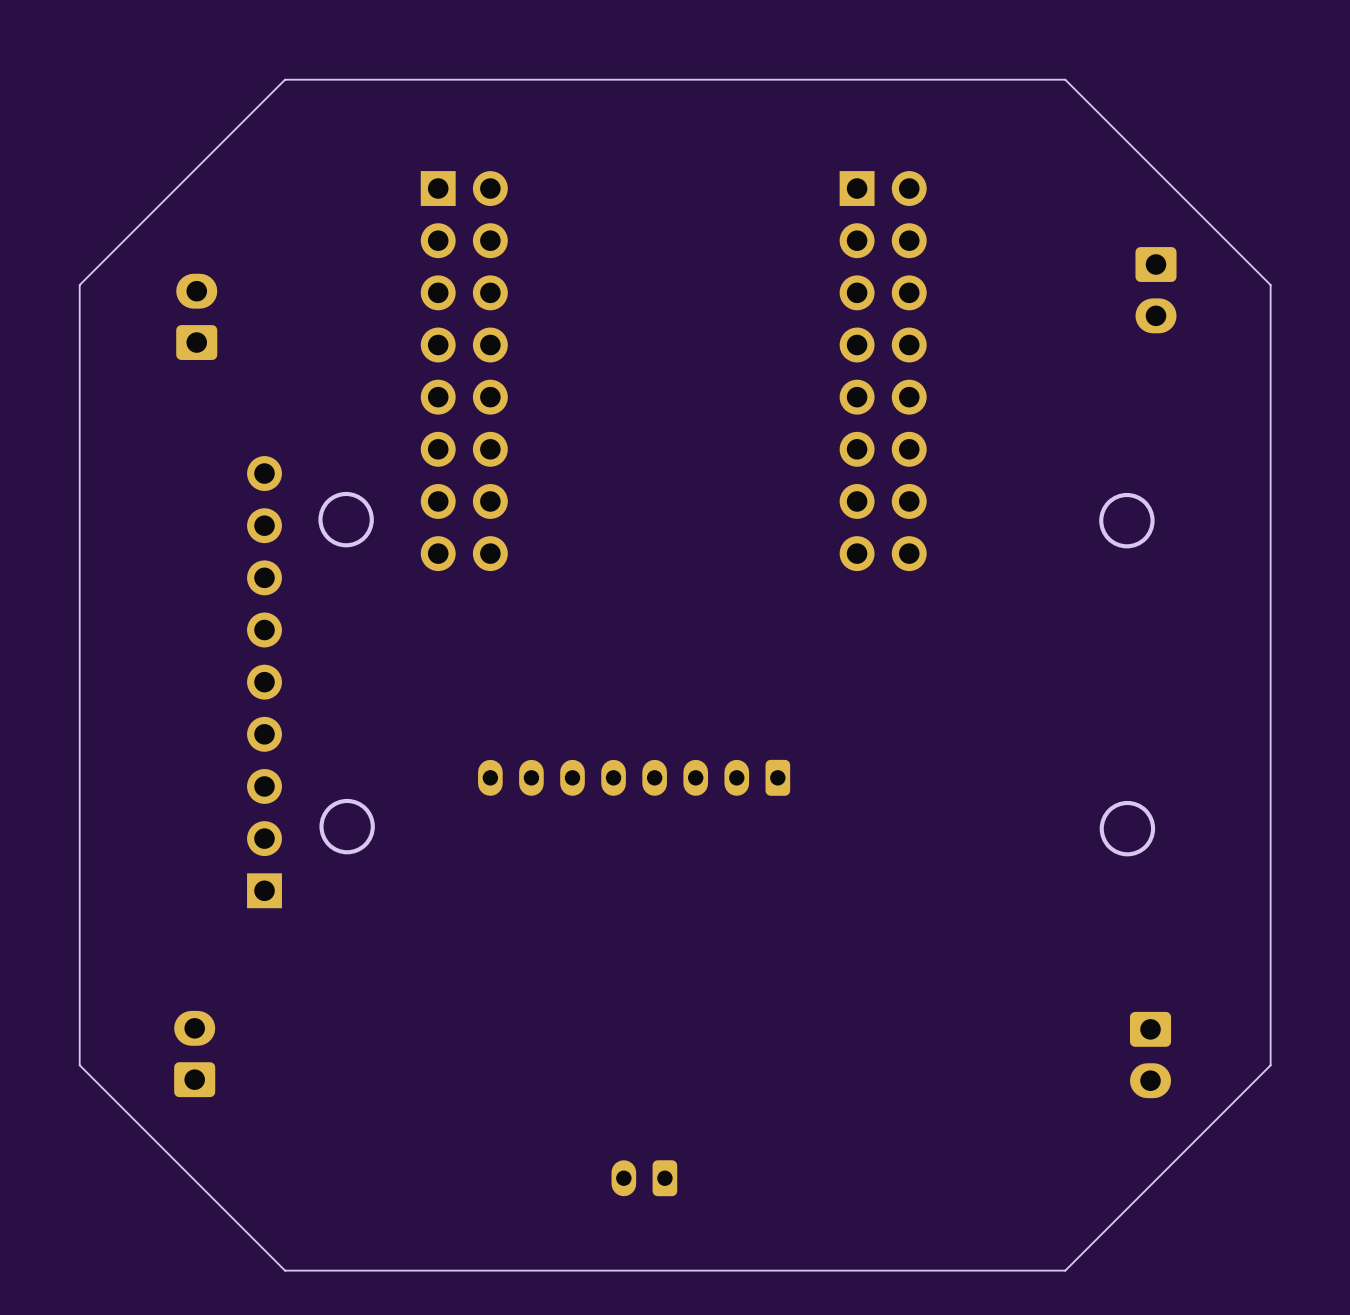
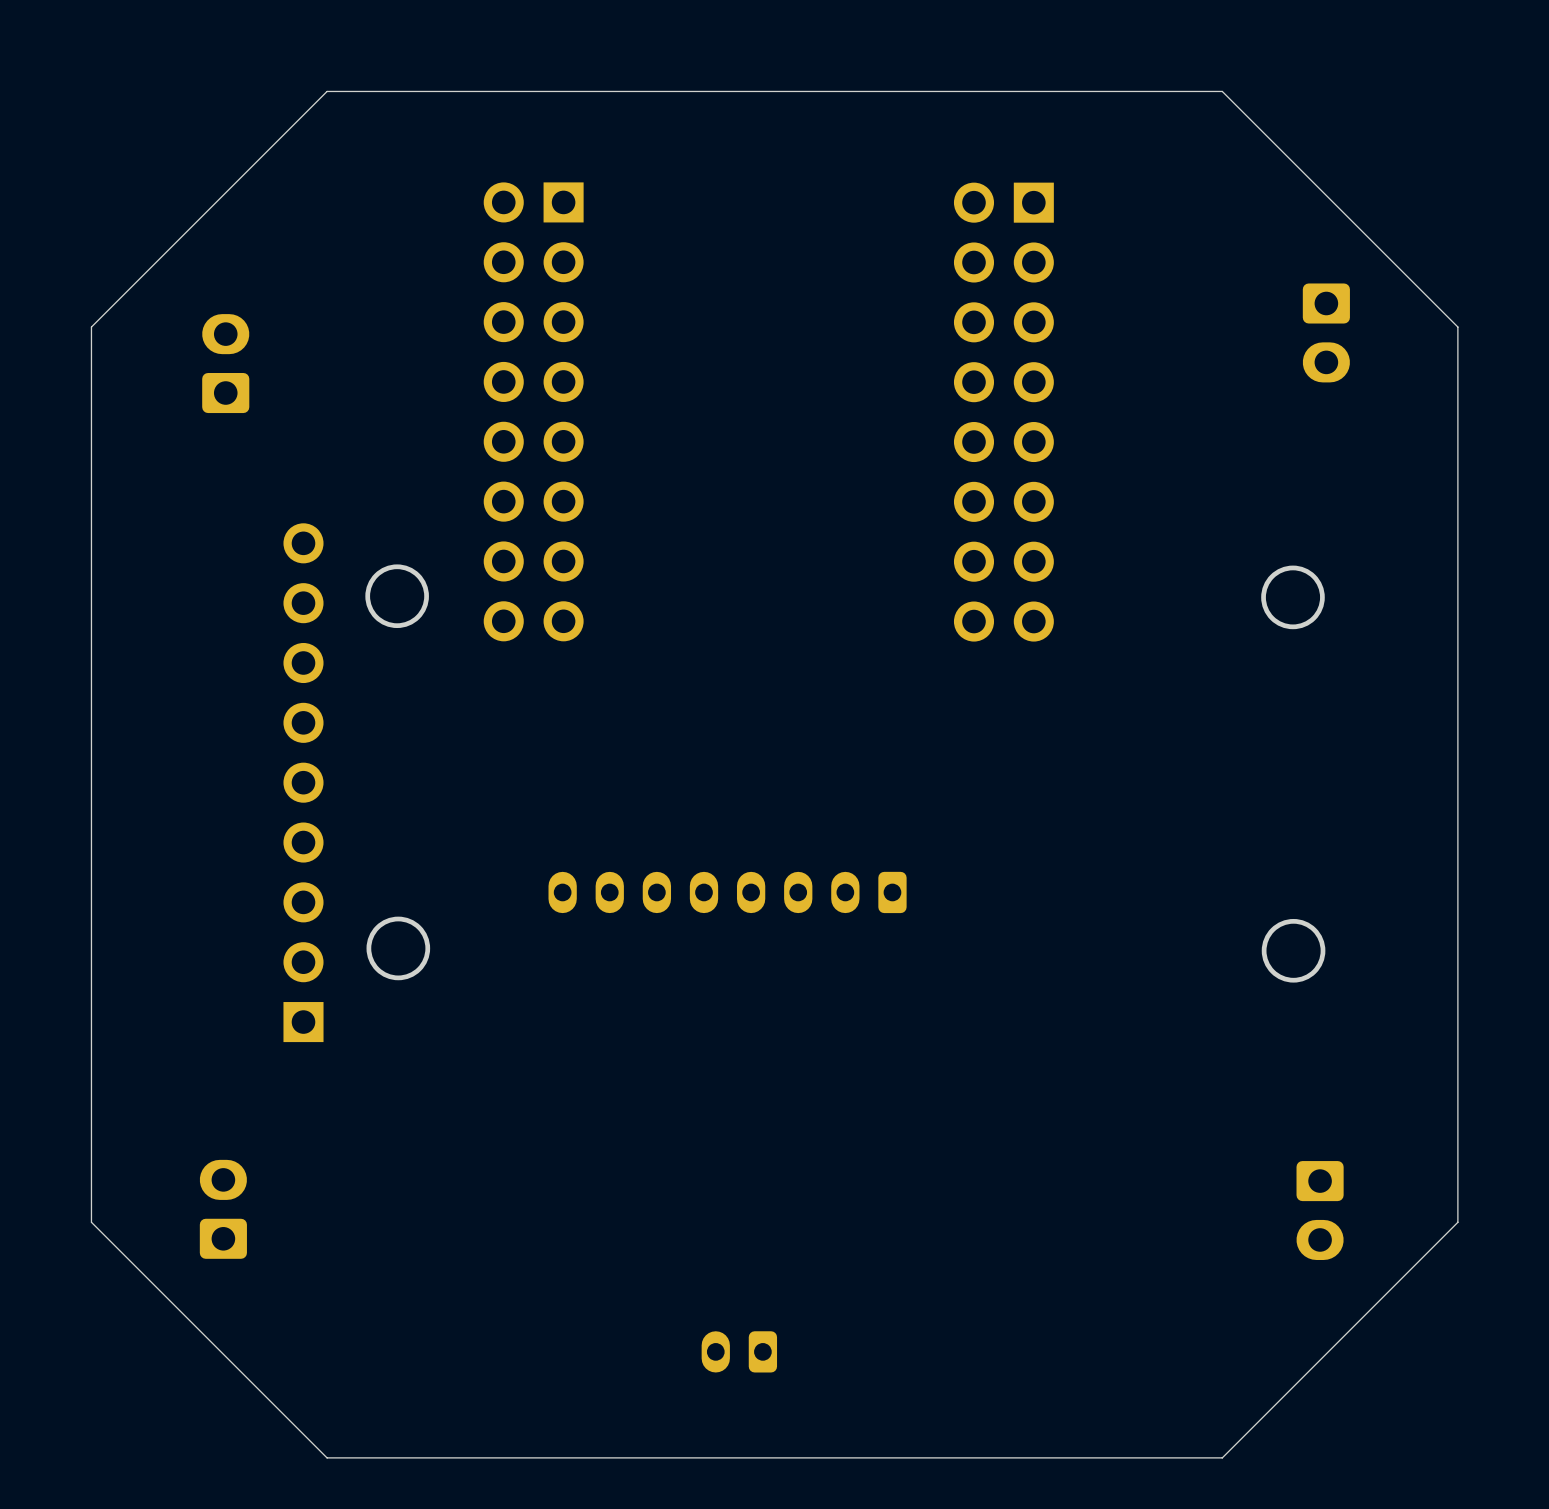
part footprint: [420, 171, 508, 572] -> [483, 182, 584, 642]
part footprint: [839, 171, 927, 572] -> [953, 182, 1054, 642]

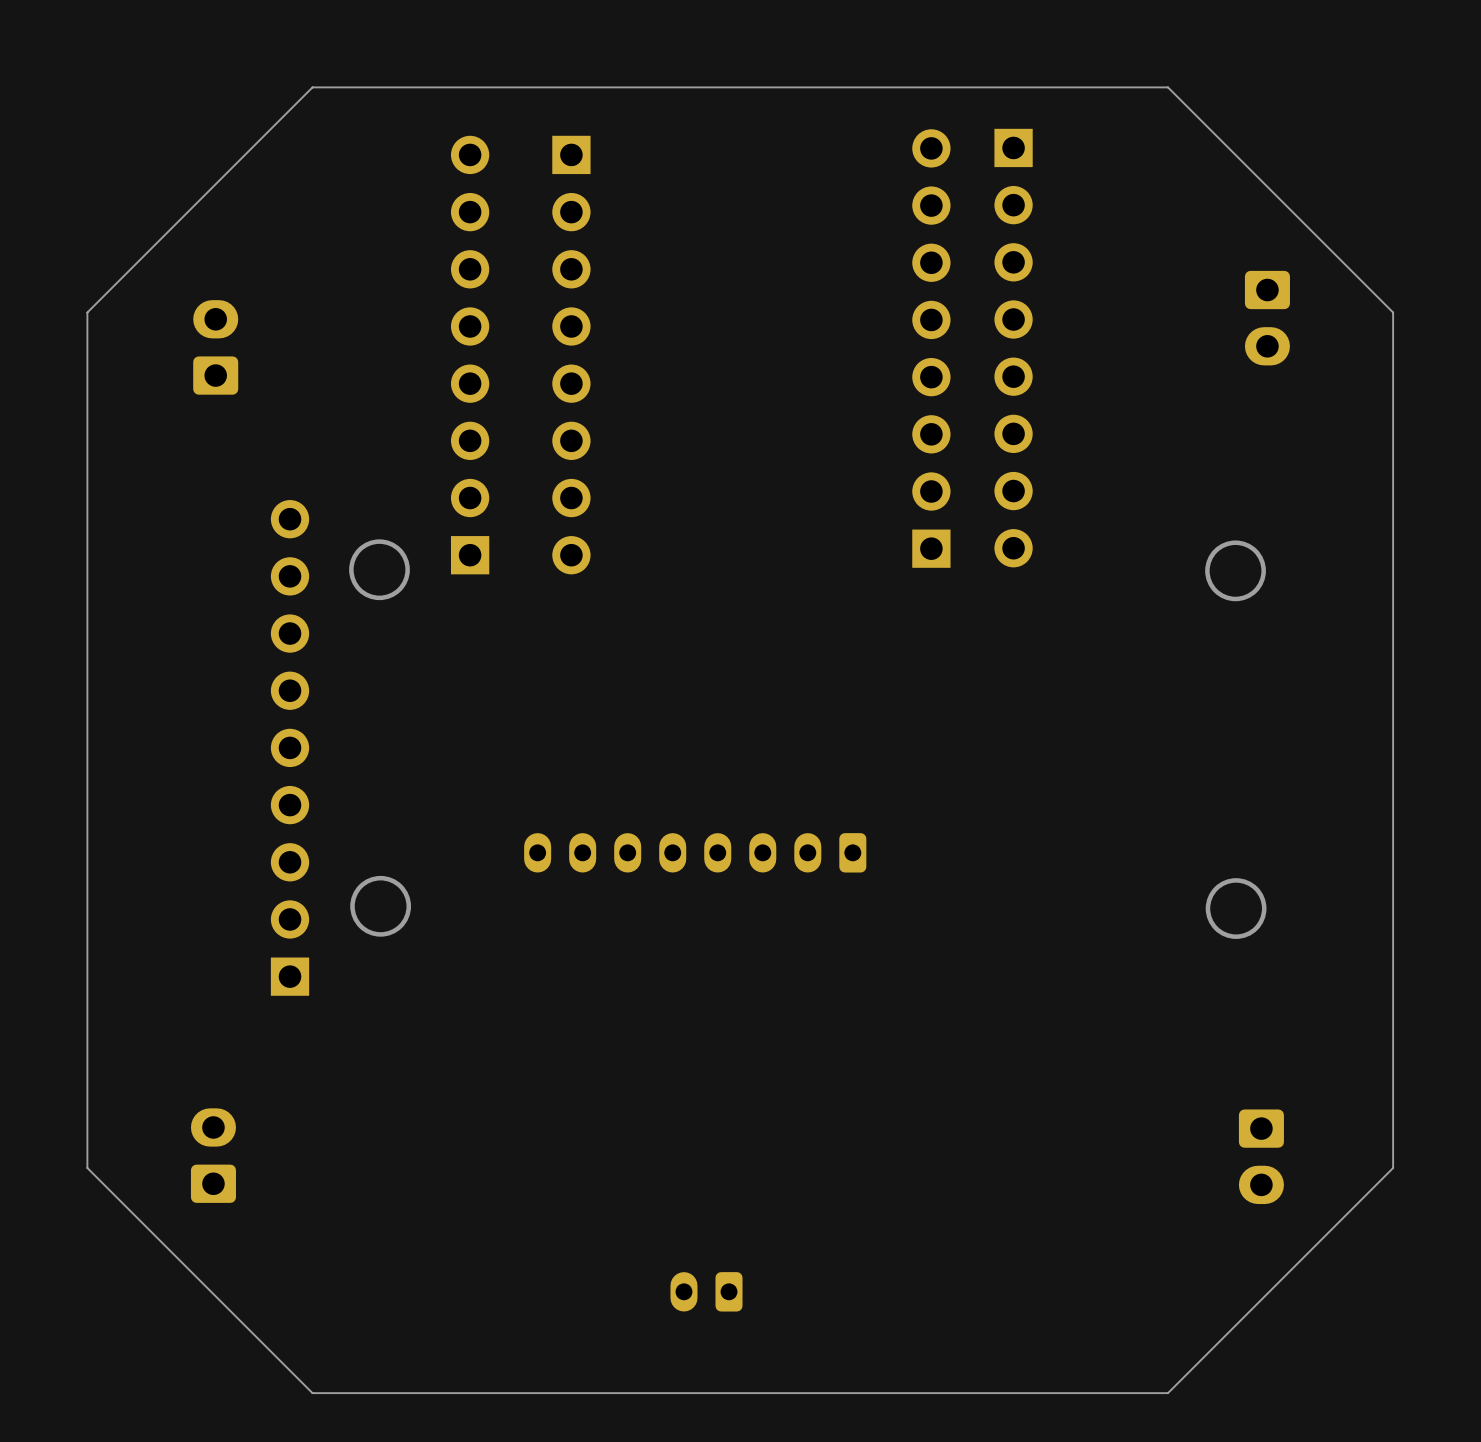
part: none -> (931, 348)
part: none -> (1013, 348)
part: none -> (470, 355)
part: none -> (571, 355)
part: (533, 411) -> none
part: (1003, 412) -> none

